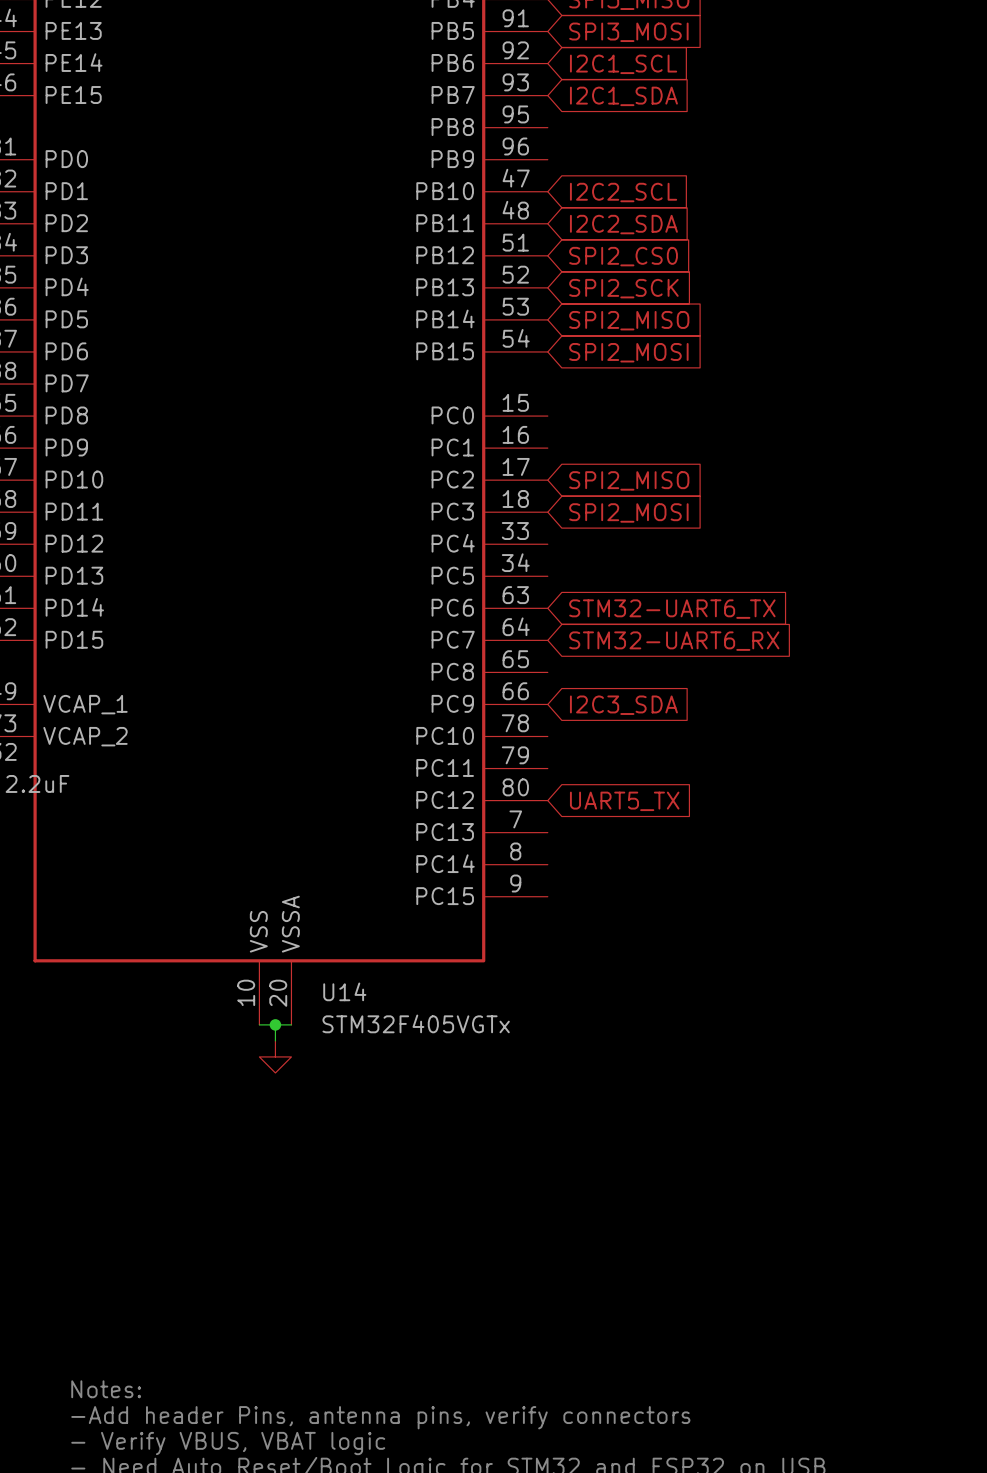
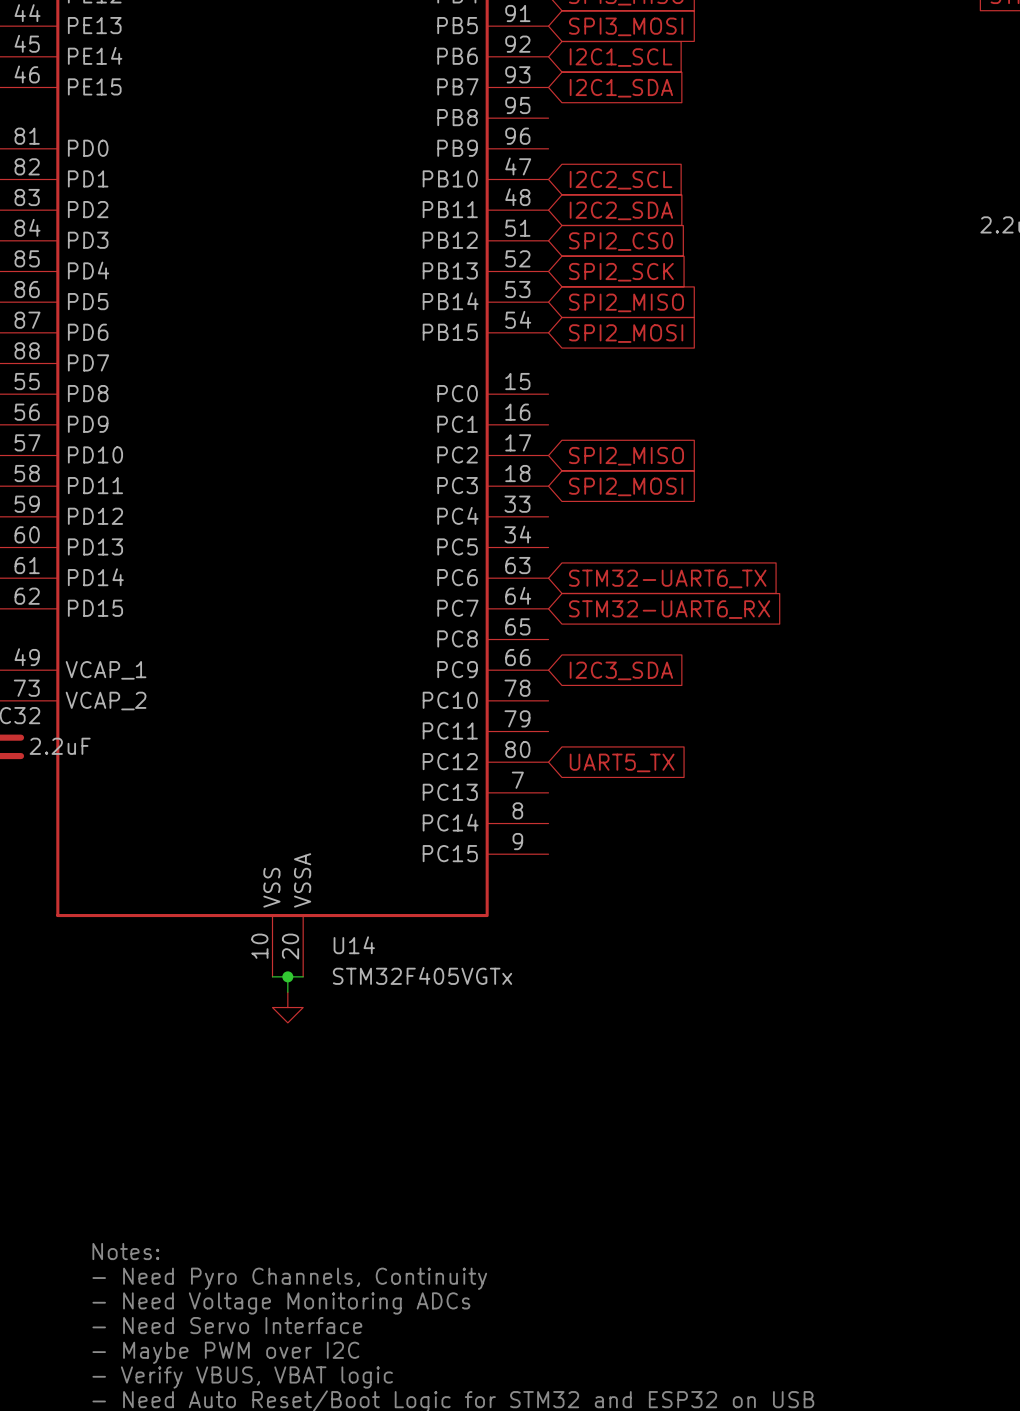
text: none -> Notes: (125, 1251)
text: none -> - Need Pyro Channels, Continuity (289, 1278)
text: none -> - Need Voltage Monitoring ADCs (281, 1303)
text: Notes: (106, 1389) -> - Need Servo Interface (227, 1325)
text: -Add header Pins, antenna pins, verify connectors (380, 1417) -> - Maybe PWM over I2C (225, 1352)

